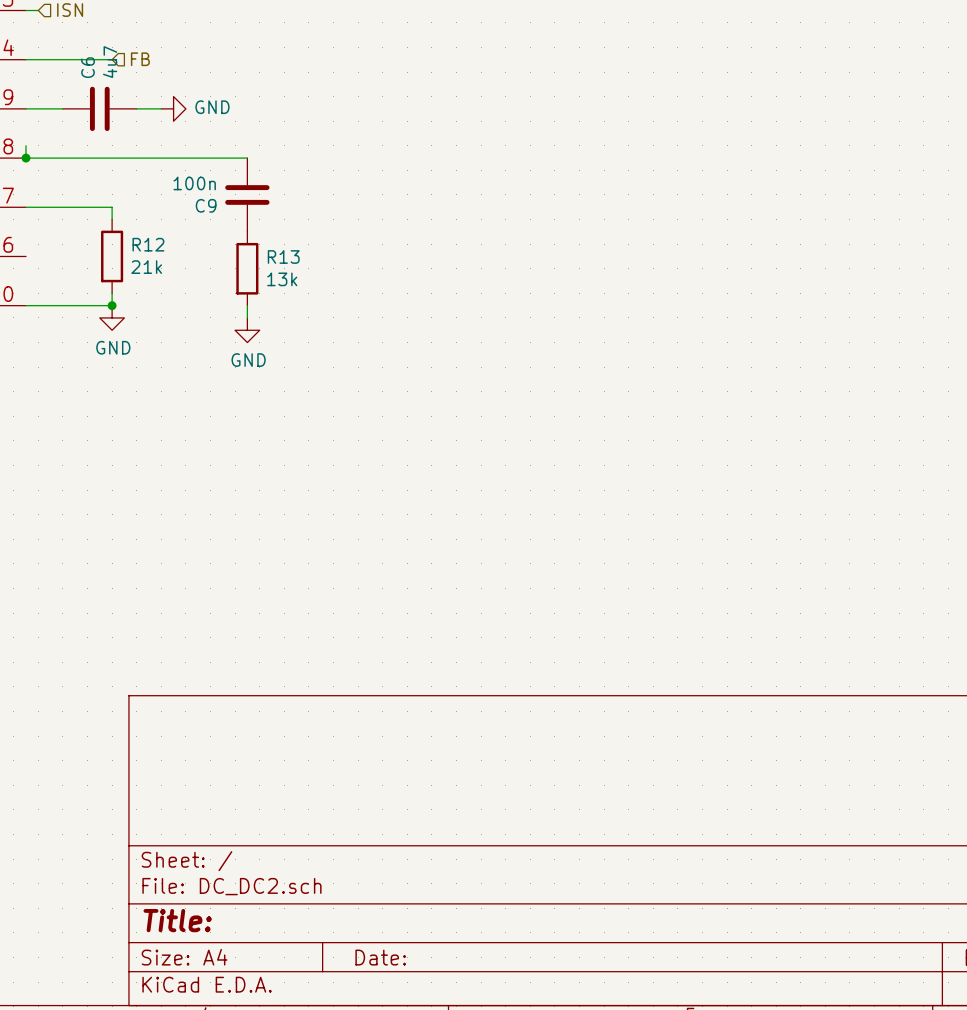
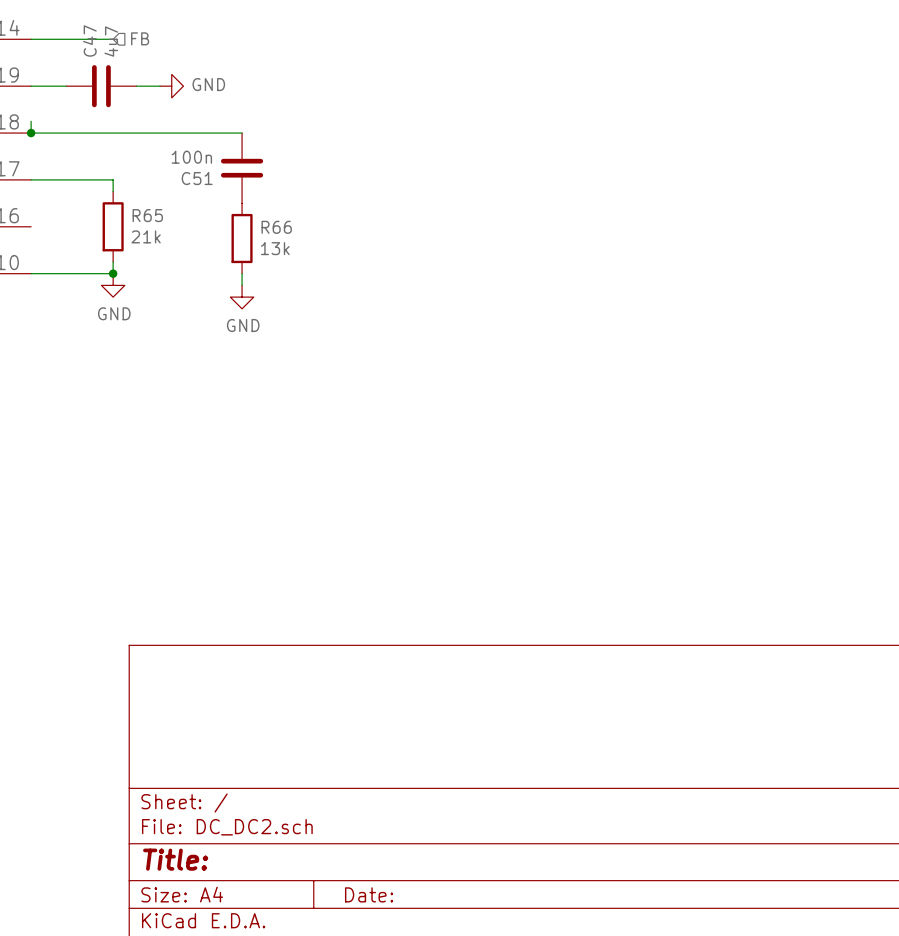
C6 name: C6 (88, 67) -> C47 (89, 40)
C9 name: C9 (206, 205) -> C51 (197, 178)
R12 name: R12 (148, 244) -> R65 (147, 215)
R13 name: R13 (283, 257) -> R66 (276, 227)

